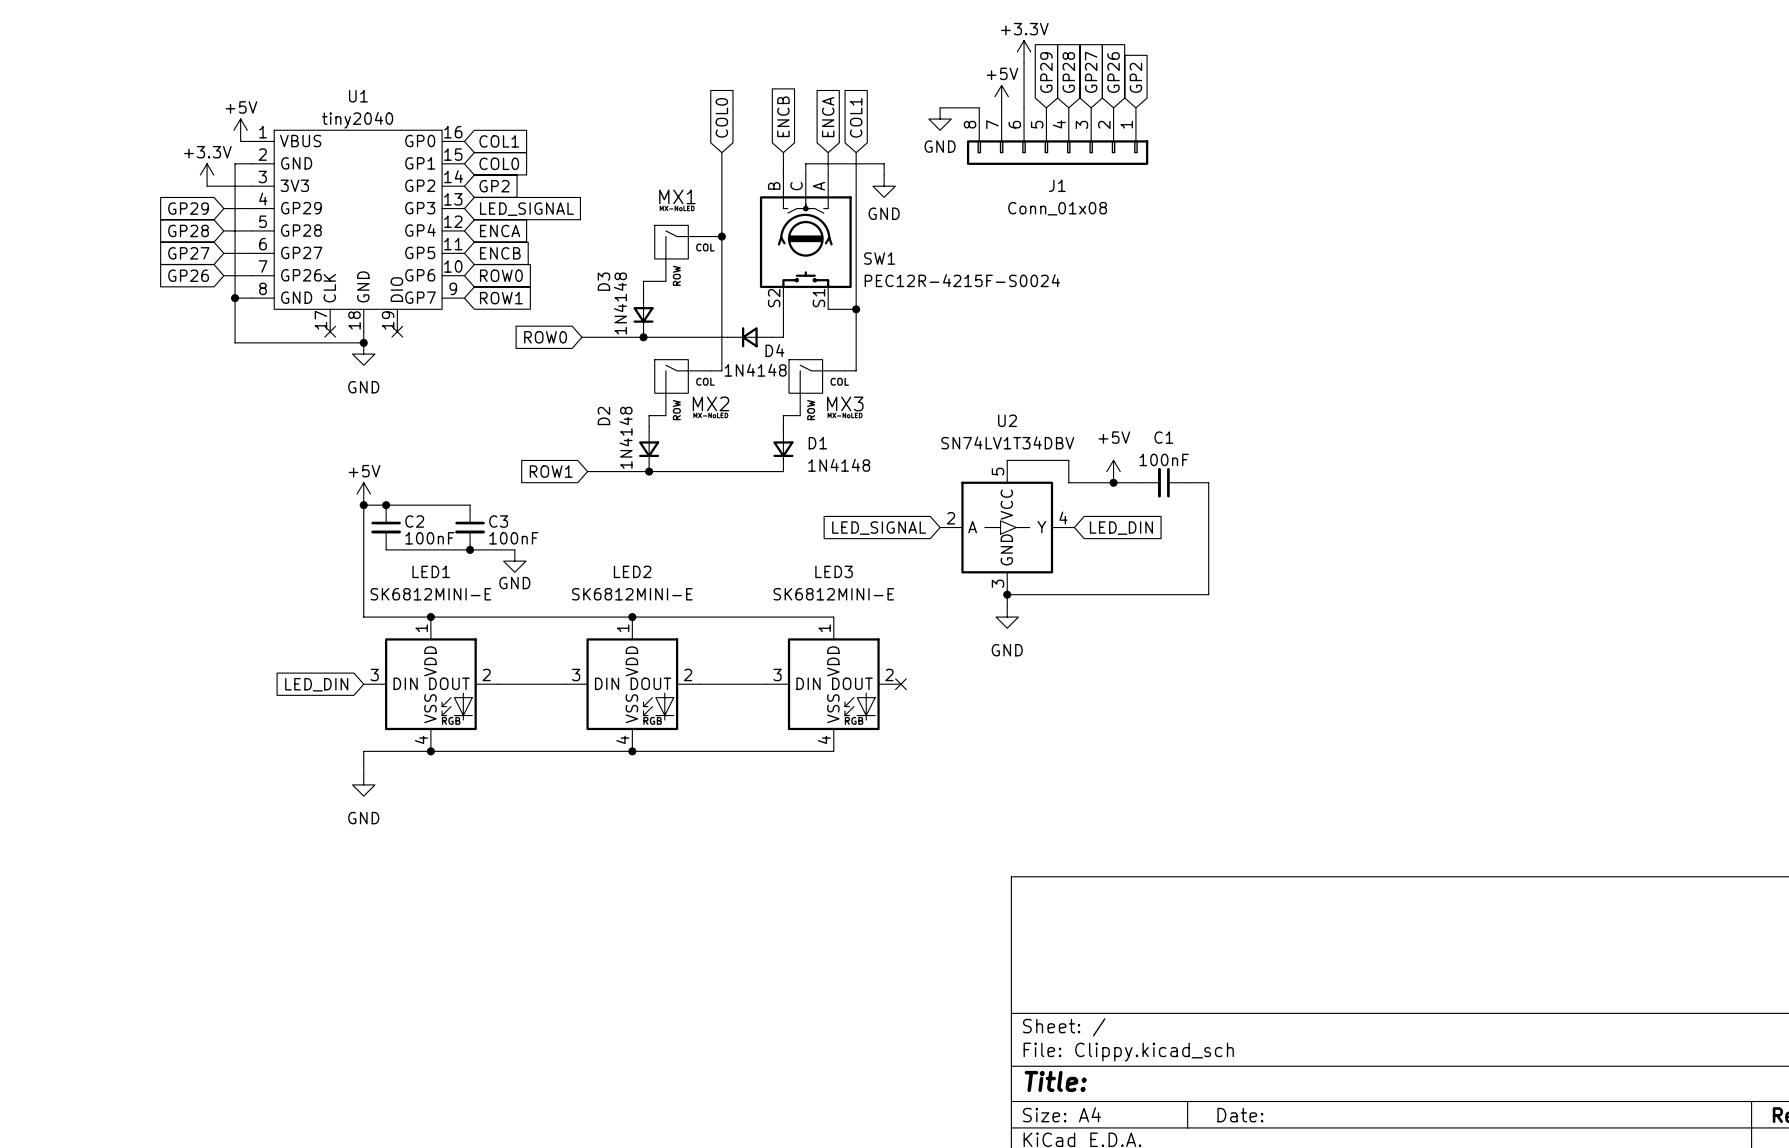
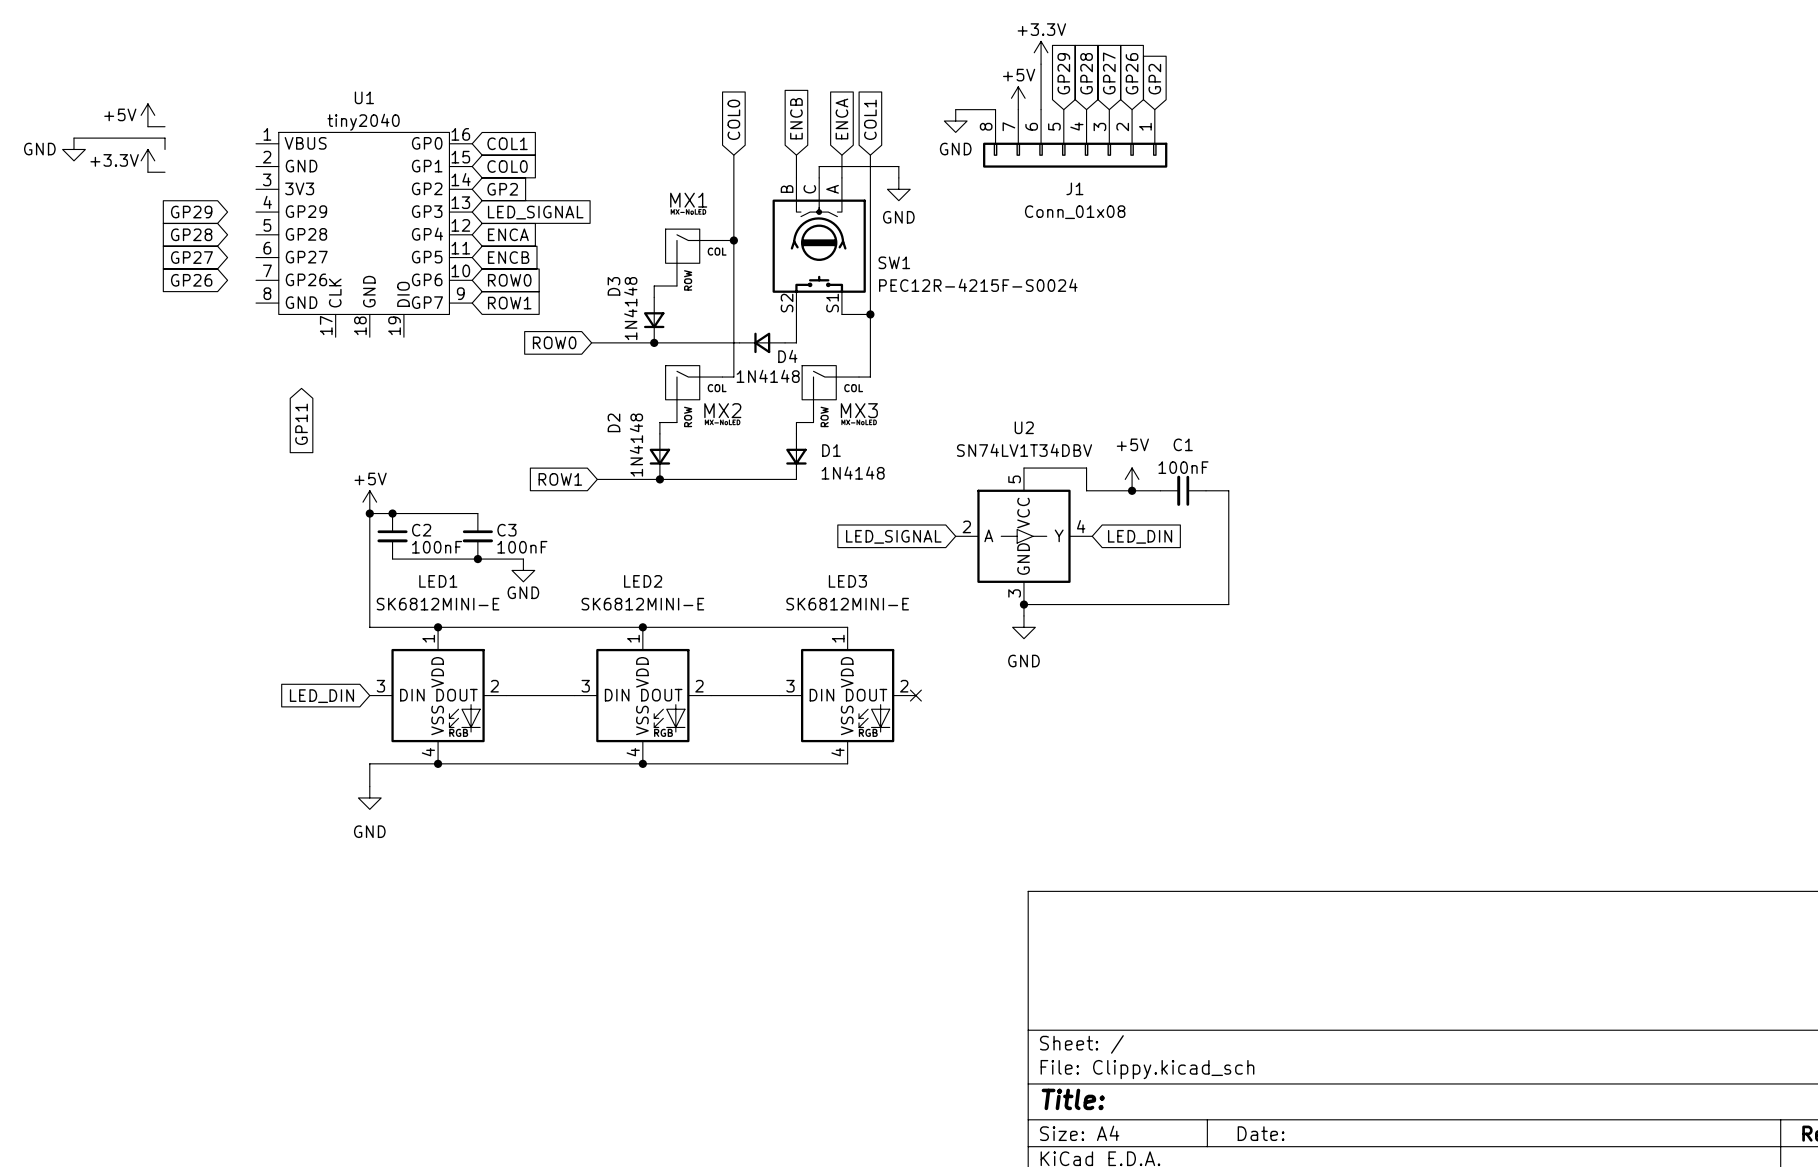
power symbol text position: +5V (241, 107) -> +5V (120, 114)
wire: none -> (147, 126) (165, 126)
power symbol position: +5V (240, 130) -> +5V (147, 115)
wire: none -> (73, 138) (165, 138) (165, 149)
wire: (240, 141) (251, 141) -> none
power symbol: none -> GND (73, 149)
power symbol text position: +3.3V (207, 152) -> +3.3V (114, 160)
wire: (251, 163) (235, 163) (235, 342) (363, 342) (363, 331) -> none
power symbol position: +3.3V (207, 175) -> +3.3V (147, 160)
wire: (207, 186) (251, 186) -> none
wire: (223, 208) (251, 208) -> none
wire: (223, 230) (251, 230) -> none
wire: (223, 253) (251, 253) -> none
wire: (223, 275) (251, 275) -> none
wire: (235, 298) (251, 298) -> (147, 172) (165, 172)
junction: (235, 298) -> none
no-connect mark: (330, 331) -> none
no-connect mark: (397, 331) -> none
junction: (363, 342) -> none
power symbol: GND (363, 354) -> none
global label: none -> GP11 (301, 424)

